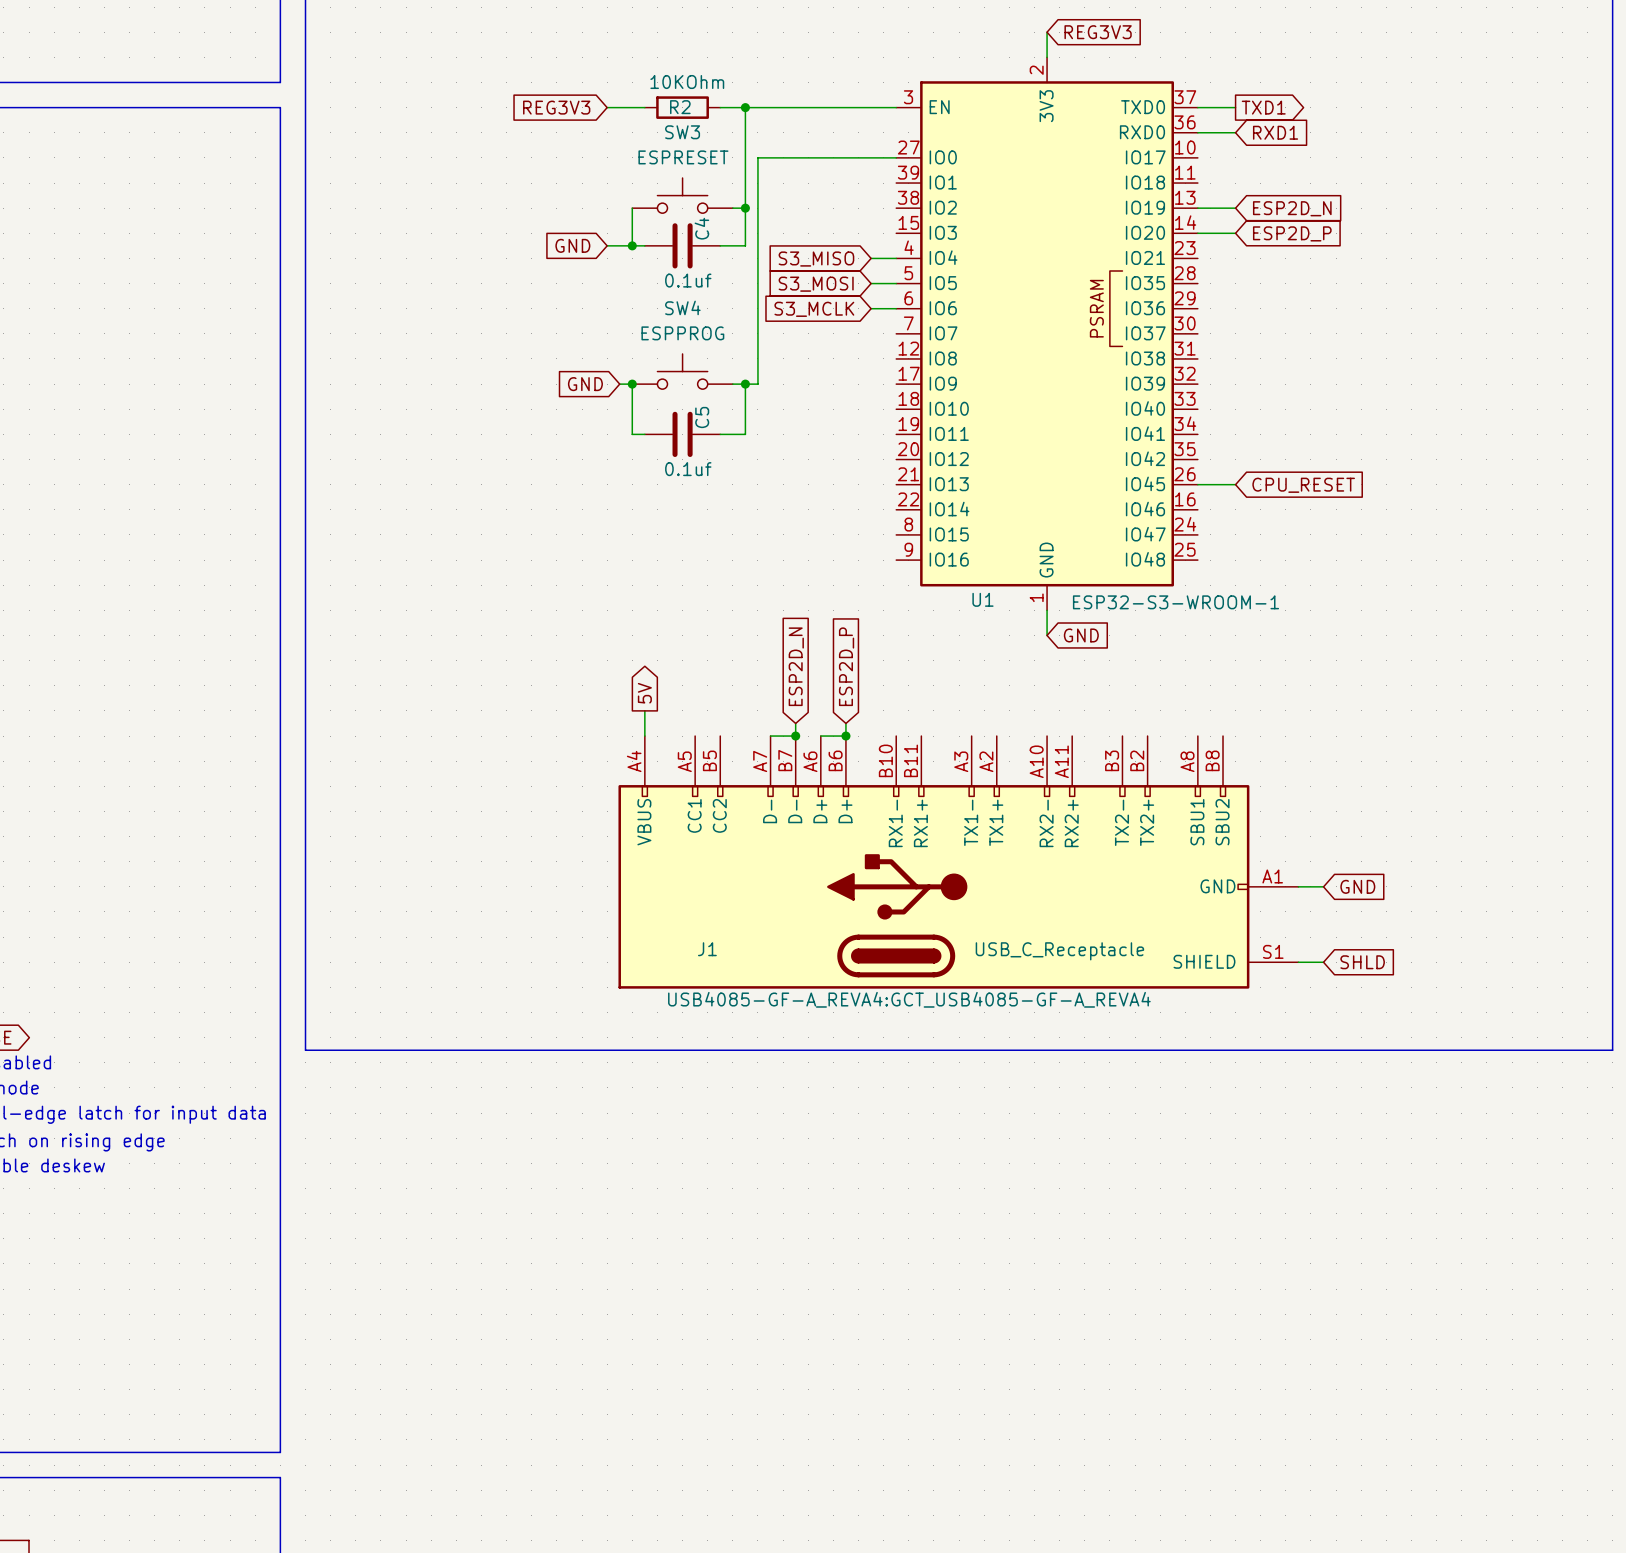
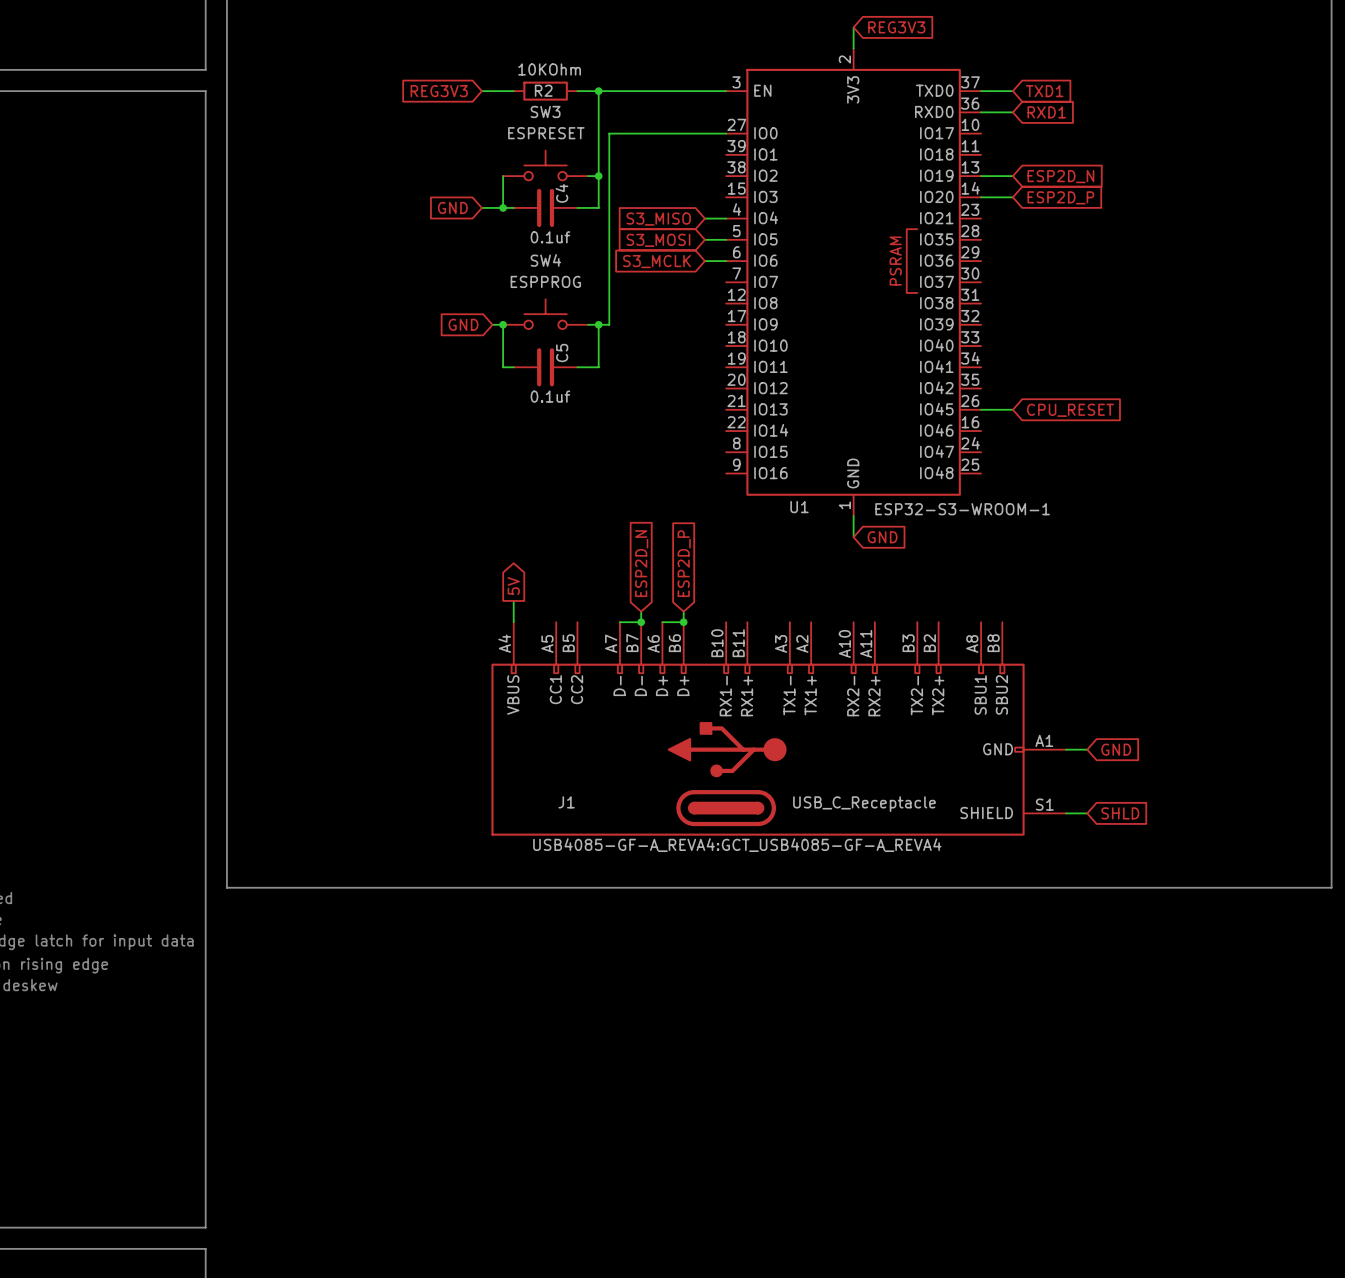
global label shape: output (1263, 107) -> input (1044, 91)

